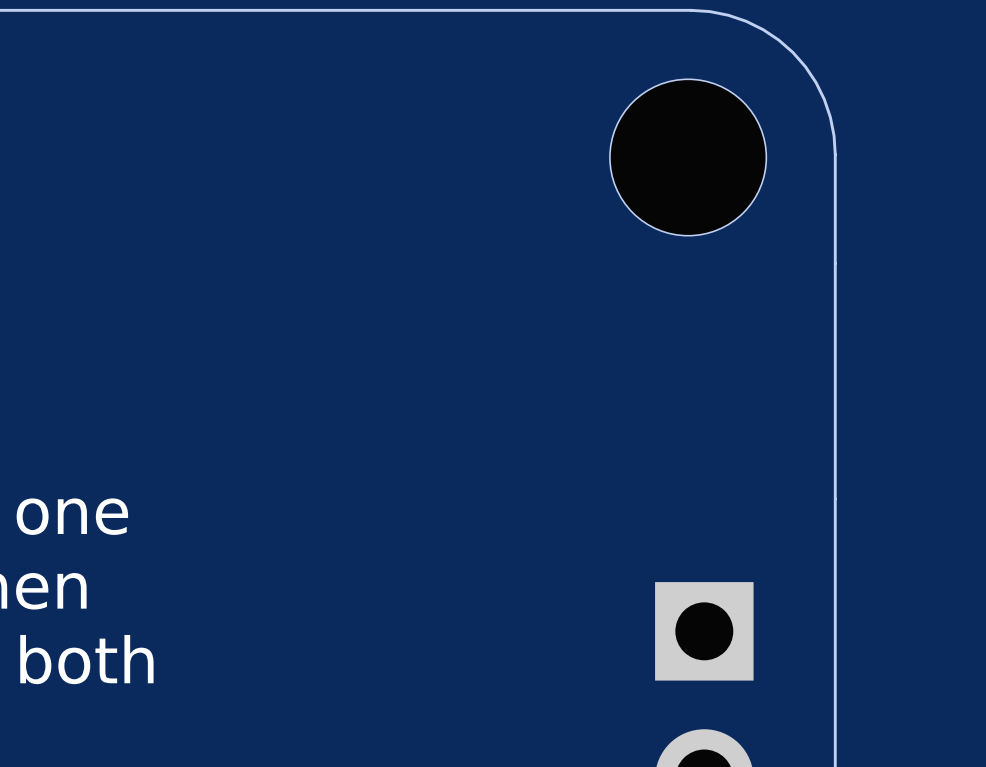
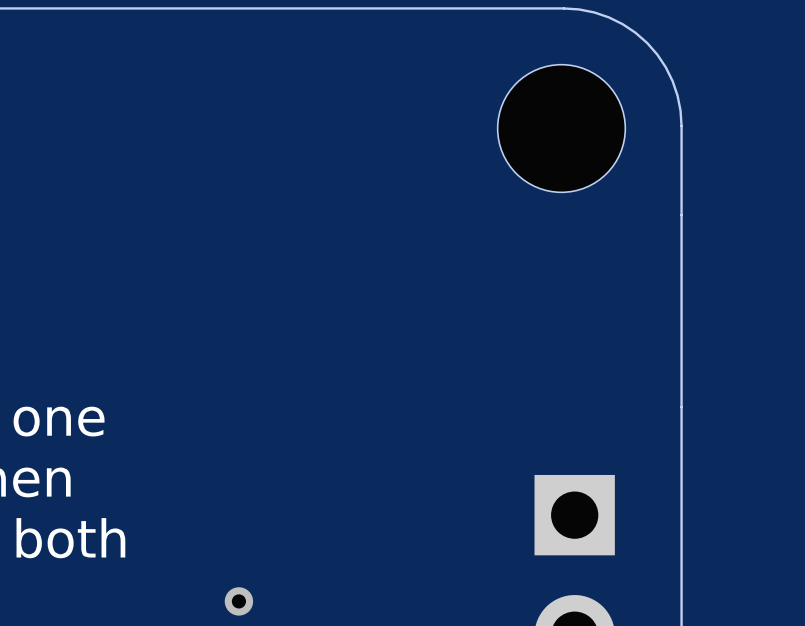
via: none -> (238, 601)

